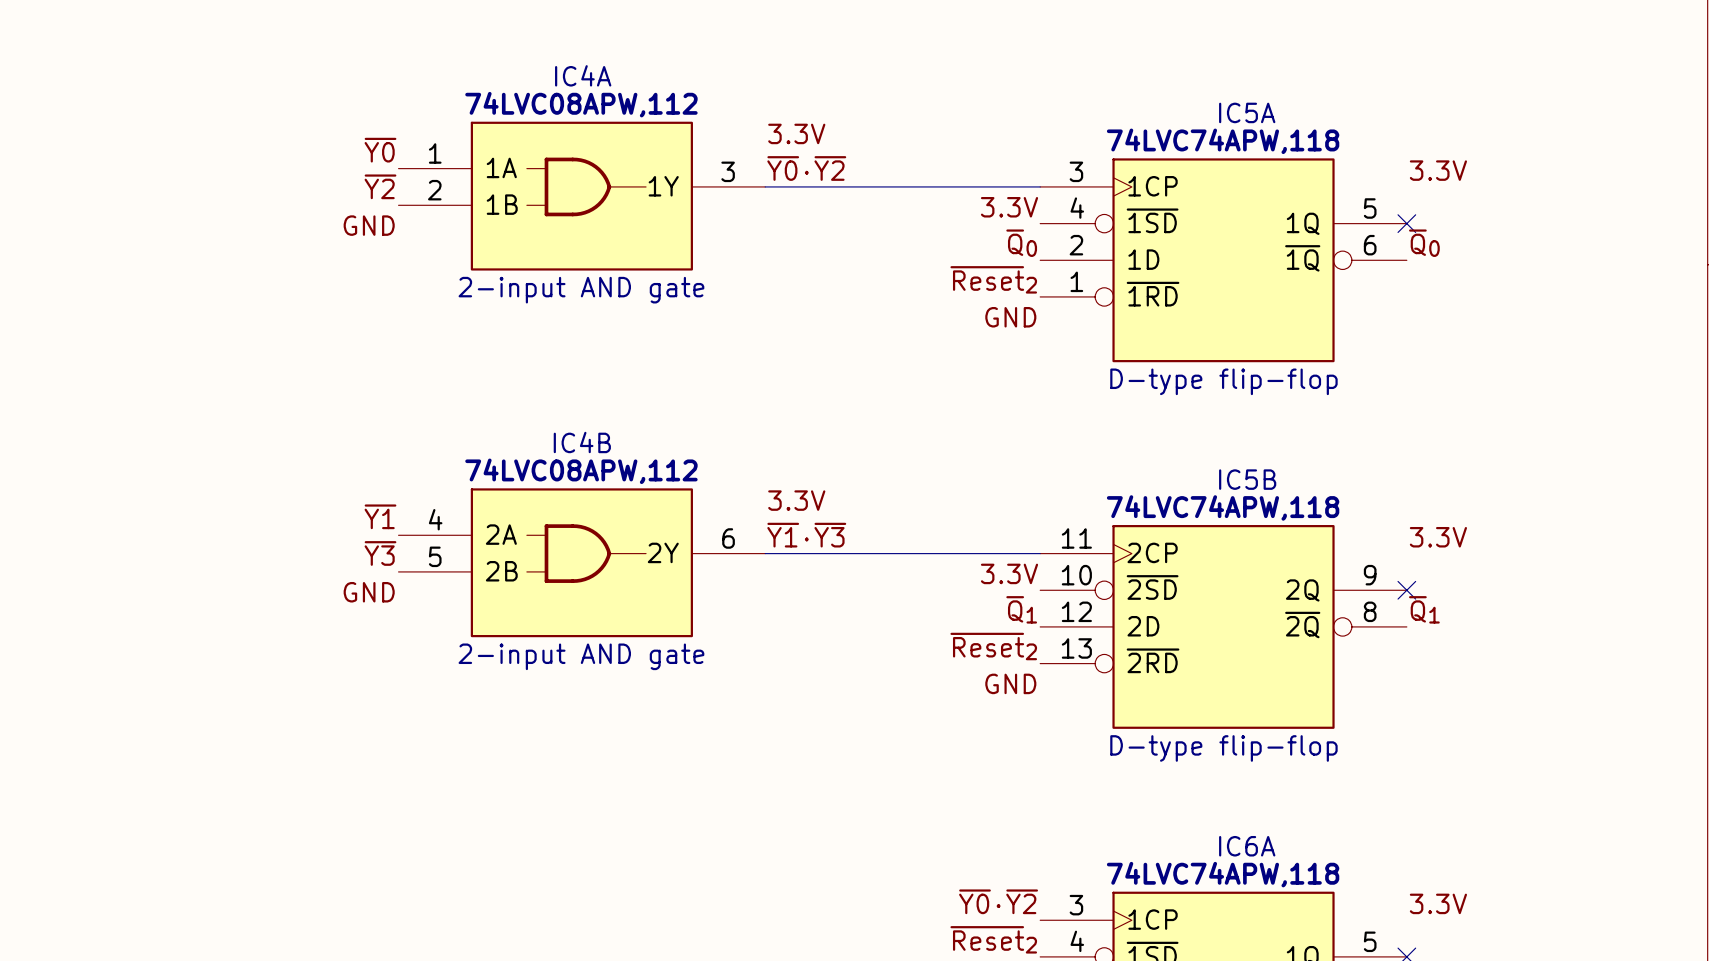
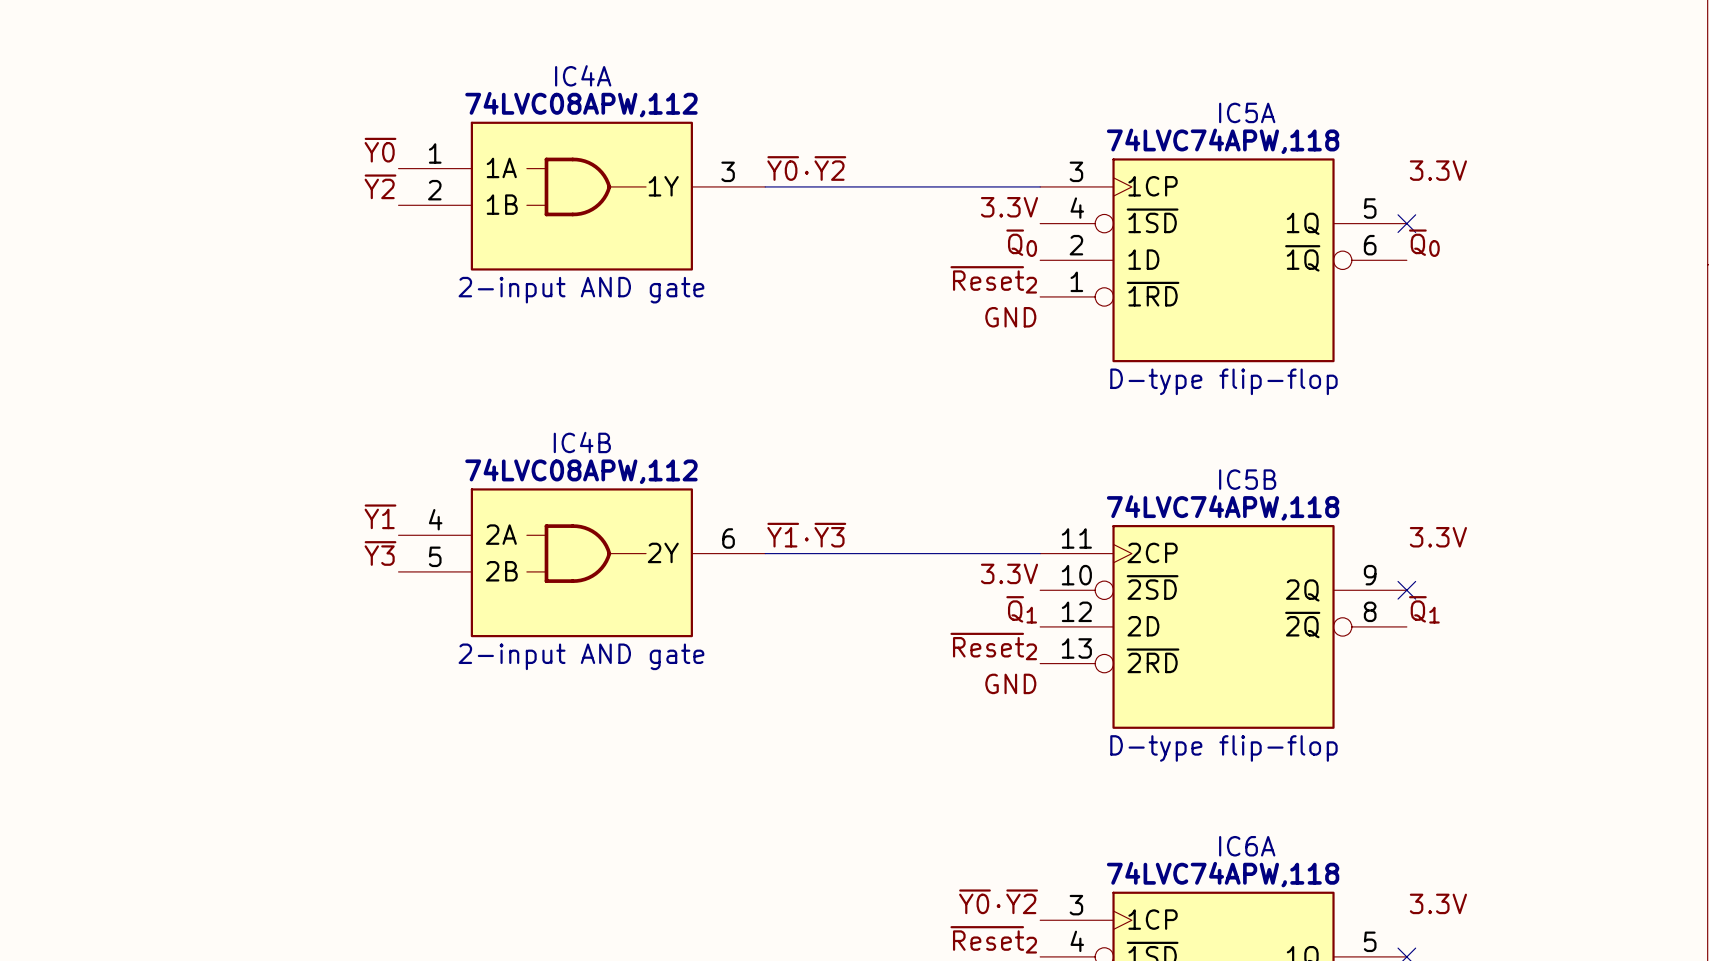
label: 3.3V (796, 133) -> none
label: GND (369, 225) -> none
label: 3.3V (796, 500) -> none
label: GND (369, 592) -> none

